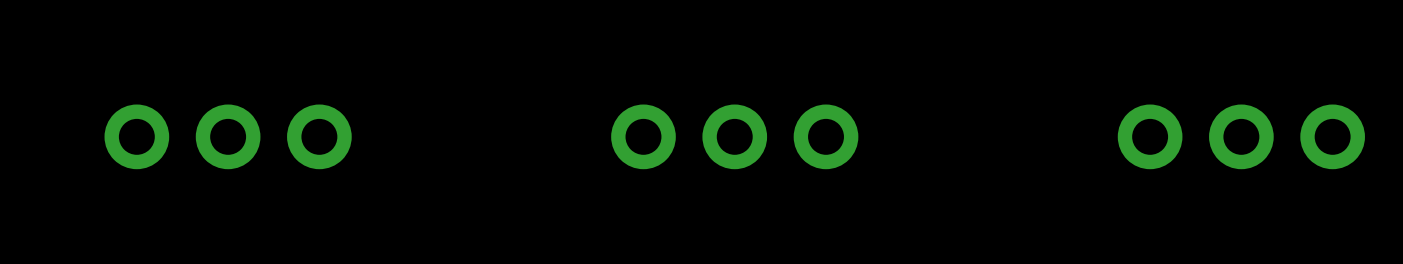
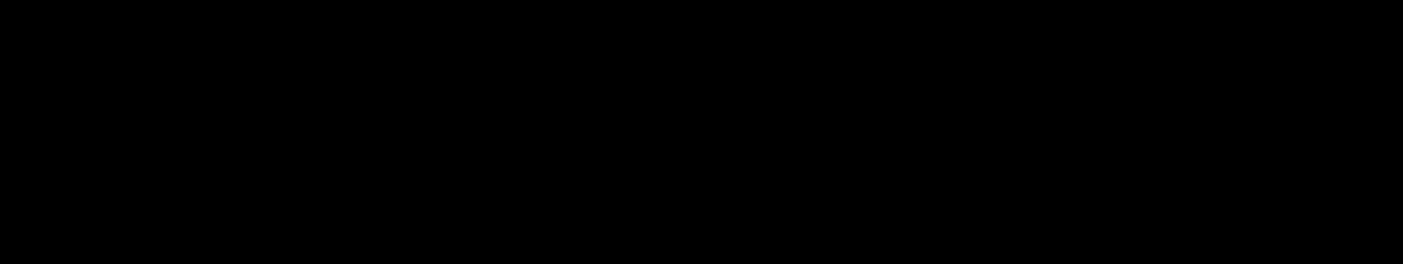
part: (228, 136) -> none
part: (734, 136) -> none
part: (1241, 136) -> none

